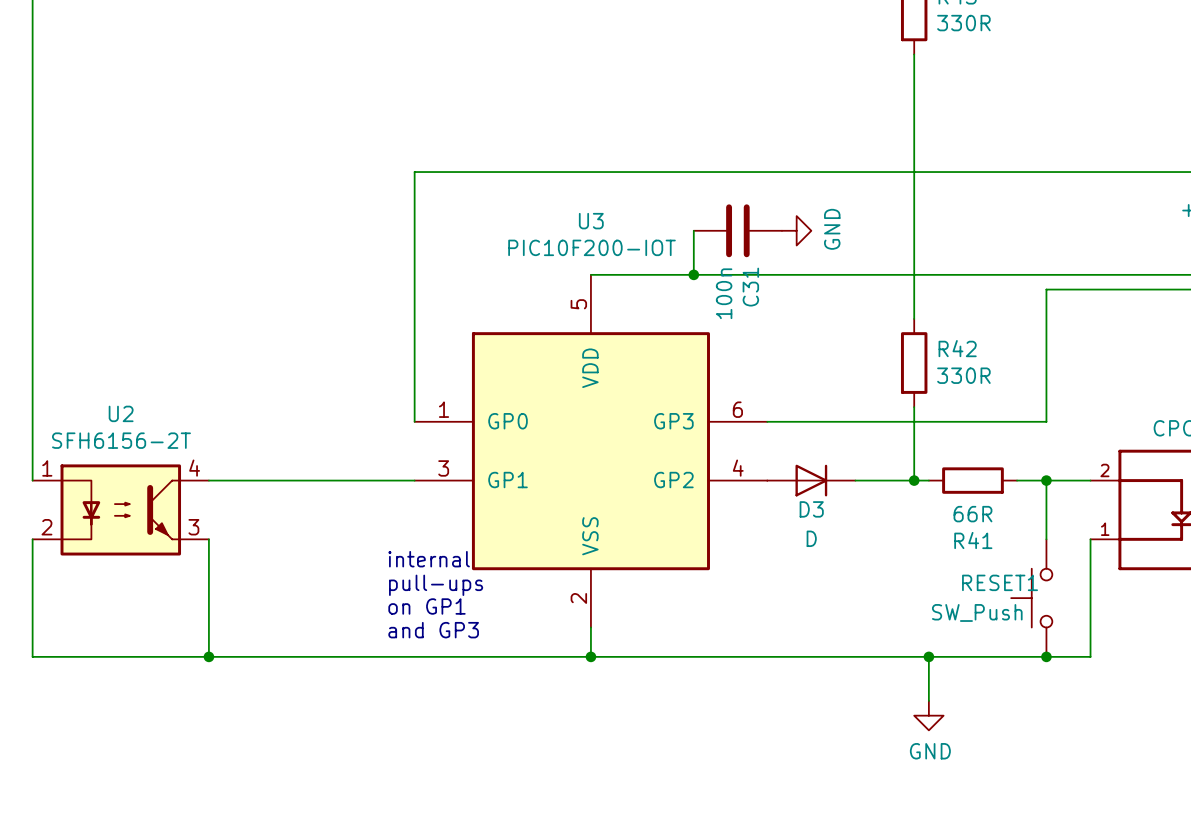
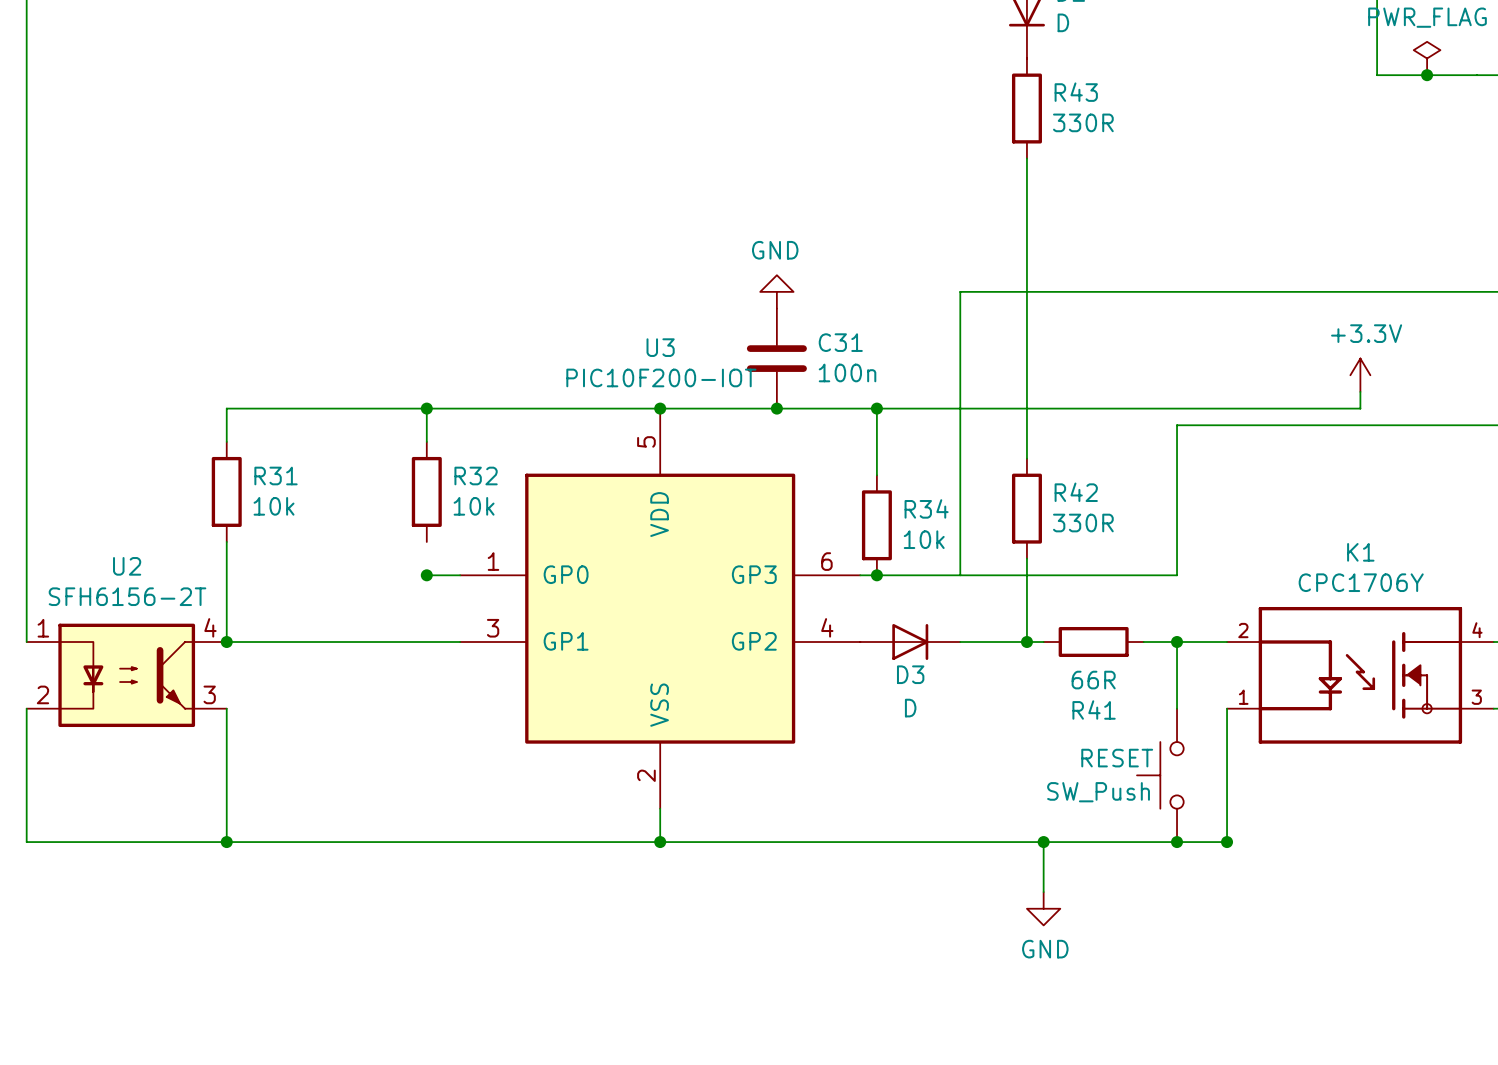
wire: (855, 172) (414, 172) (414, 421) -> (960, 291) (960, 575)
C31 rotation: 0° (737, 230) -> 90° clockwise (776, 358)
power symbol rotation: 0° (796, 230) -> 90° counterclockwise (776, 291)
power symbol position: GND (796, 230) -> GND (776, 291)
wire: none -> (426, 408) (426, 441)
junction: none -> (426, 408)
wire: none -> (660, 408) (226, 408) (226, 441)
junction: none -> (660, 408)
wire: none -> (876, 408) (876, 475)
junction: none -> (876, 408)
C31 name position: C31 (750, 287) -> C31 (840, 342)
C31 value position: 100n (724, 293) -> 100n (847, 372)
R31: none -> 10k (226, 491)
R32: none -> 10k (426, 491)
R34: none -> 10k (876, 525)
wire: none -> (226, 541) (226, 642)
wire: none -> (426, 575) (460, 575)
junction: none -> (426, 575)
junction: none -> (876, 575)
junction: none -> (226, 642)
text: internal (429, 559) -> none
RESET1 name: RESET1 (1000, 582) -> RESET (1117, 758)
text: pull-ups (436, 585) -> none
text: on GP1 (426, 606) -> none
text: and GP3 (433, 630) -> none
junction: none -> (1227, 842)

